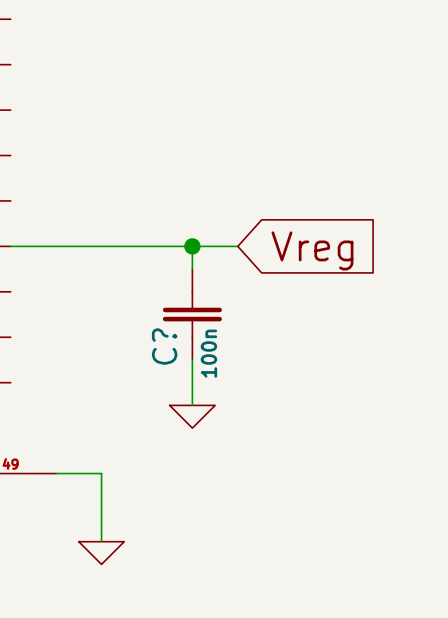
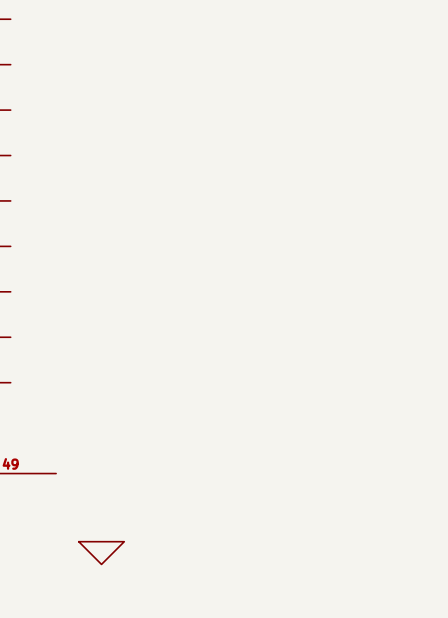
wire: (10, 246) (237, 246) -> none
wire: (192, 246) (192, 269) -> none
junction: (192, 246) -> none
global label: Vreg (312, 250) -> none
C?: 100n (192, 314) -> none
wire: (192, 359) (192, 405) -> none
power symbol: (192, 416) -> none
wire: (56, 473) (101, 473) (101, 541) -> none

